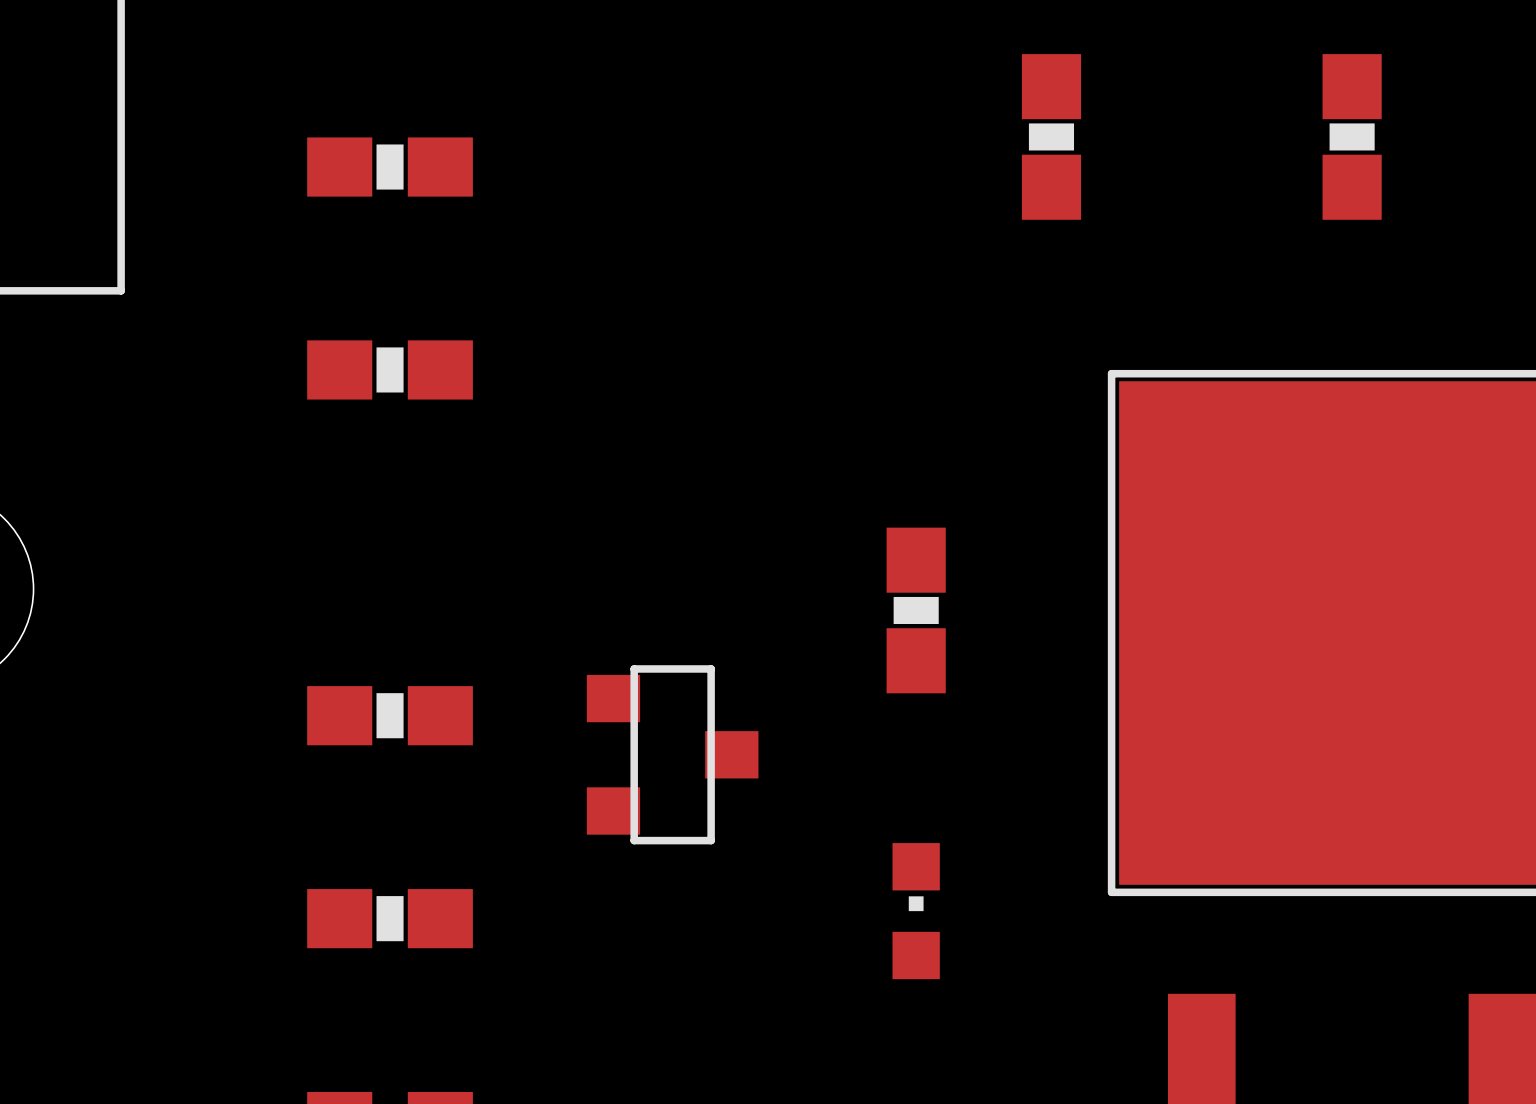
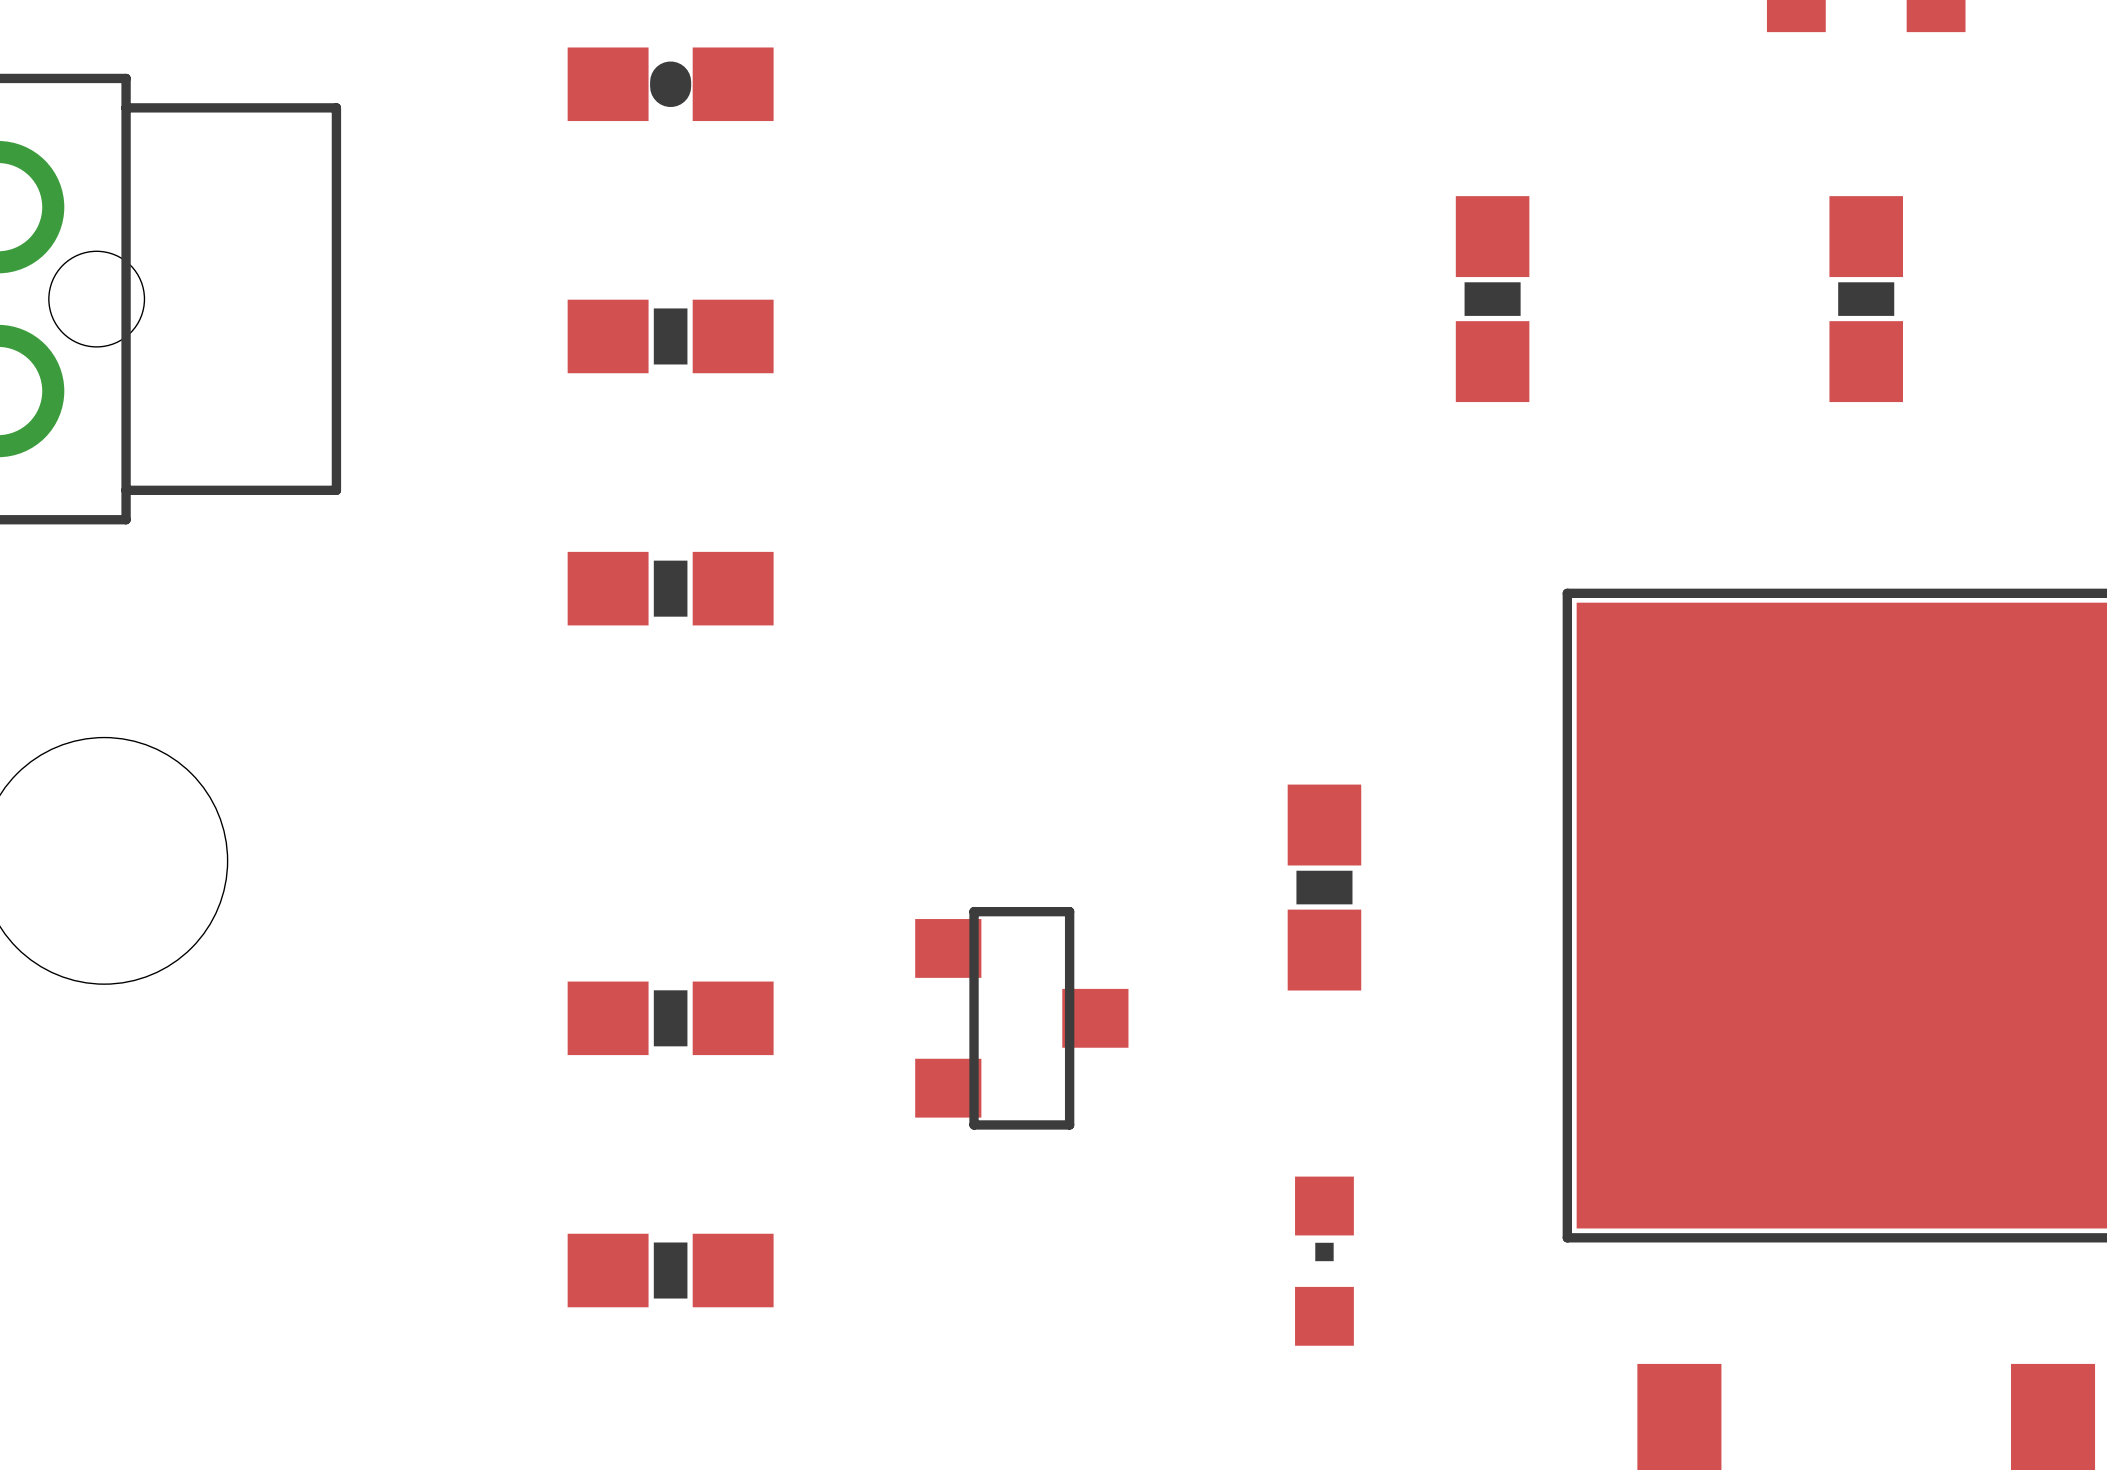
part position: (672, 754) -> (1021, 1018)

